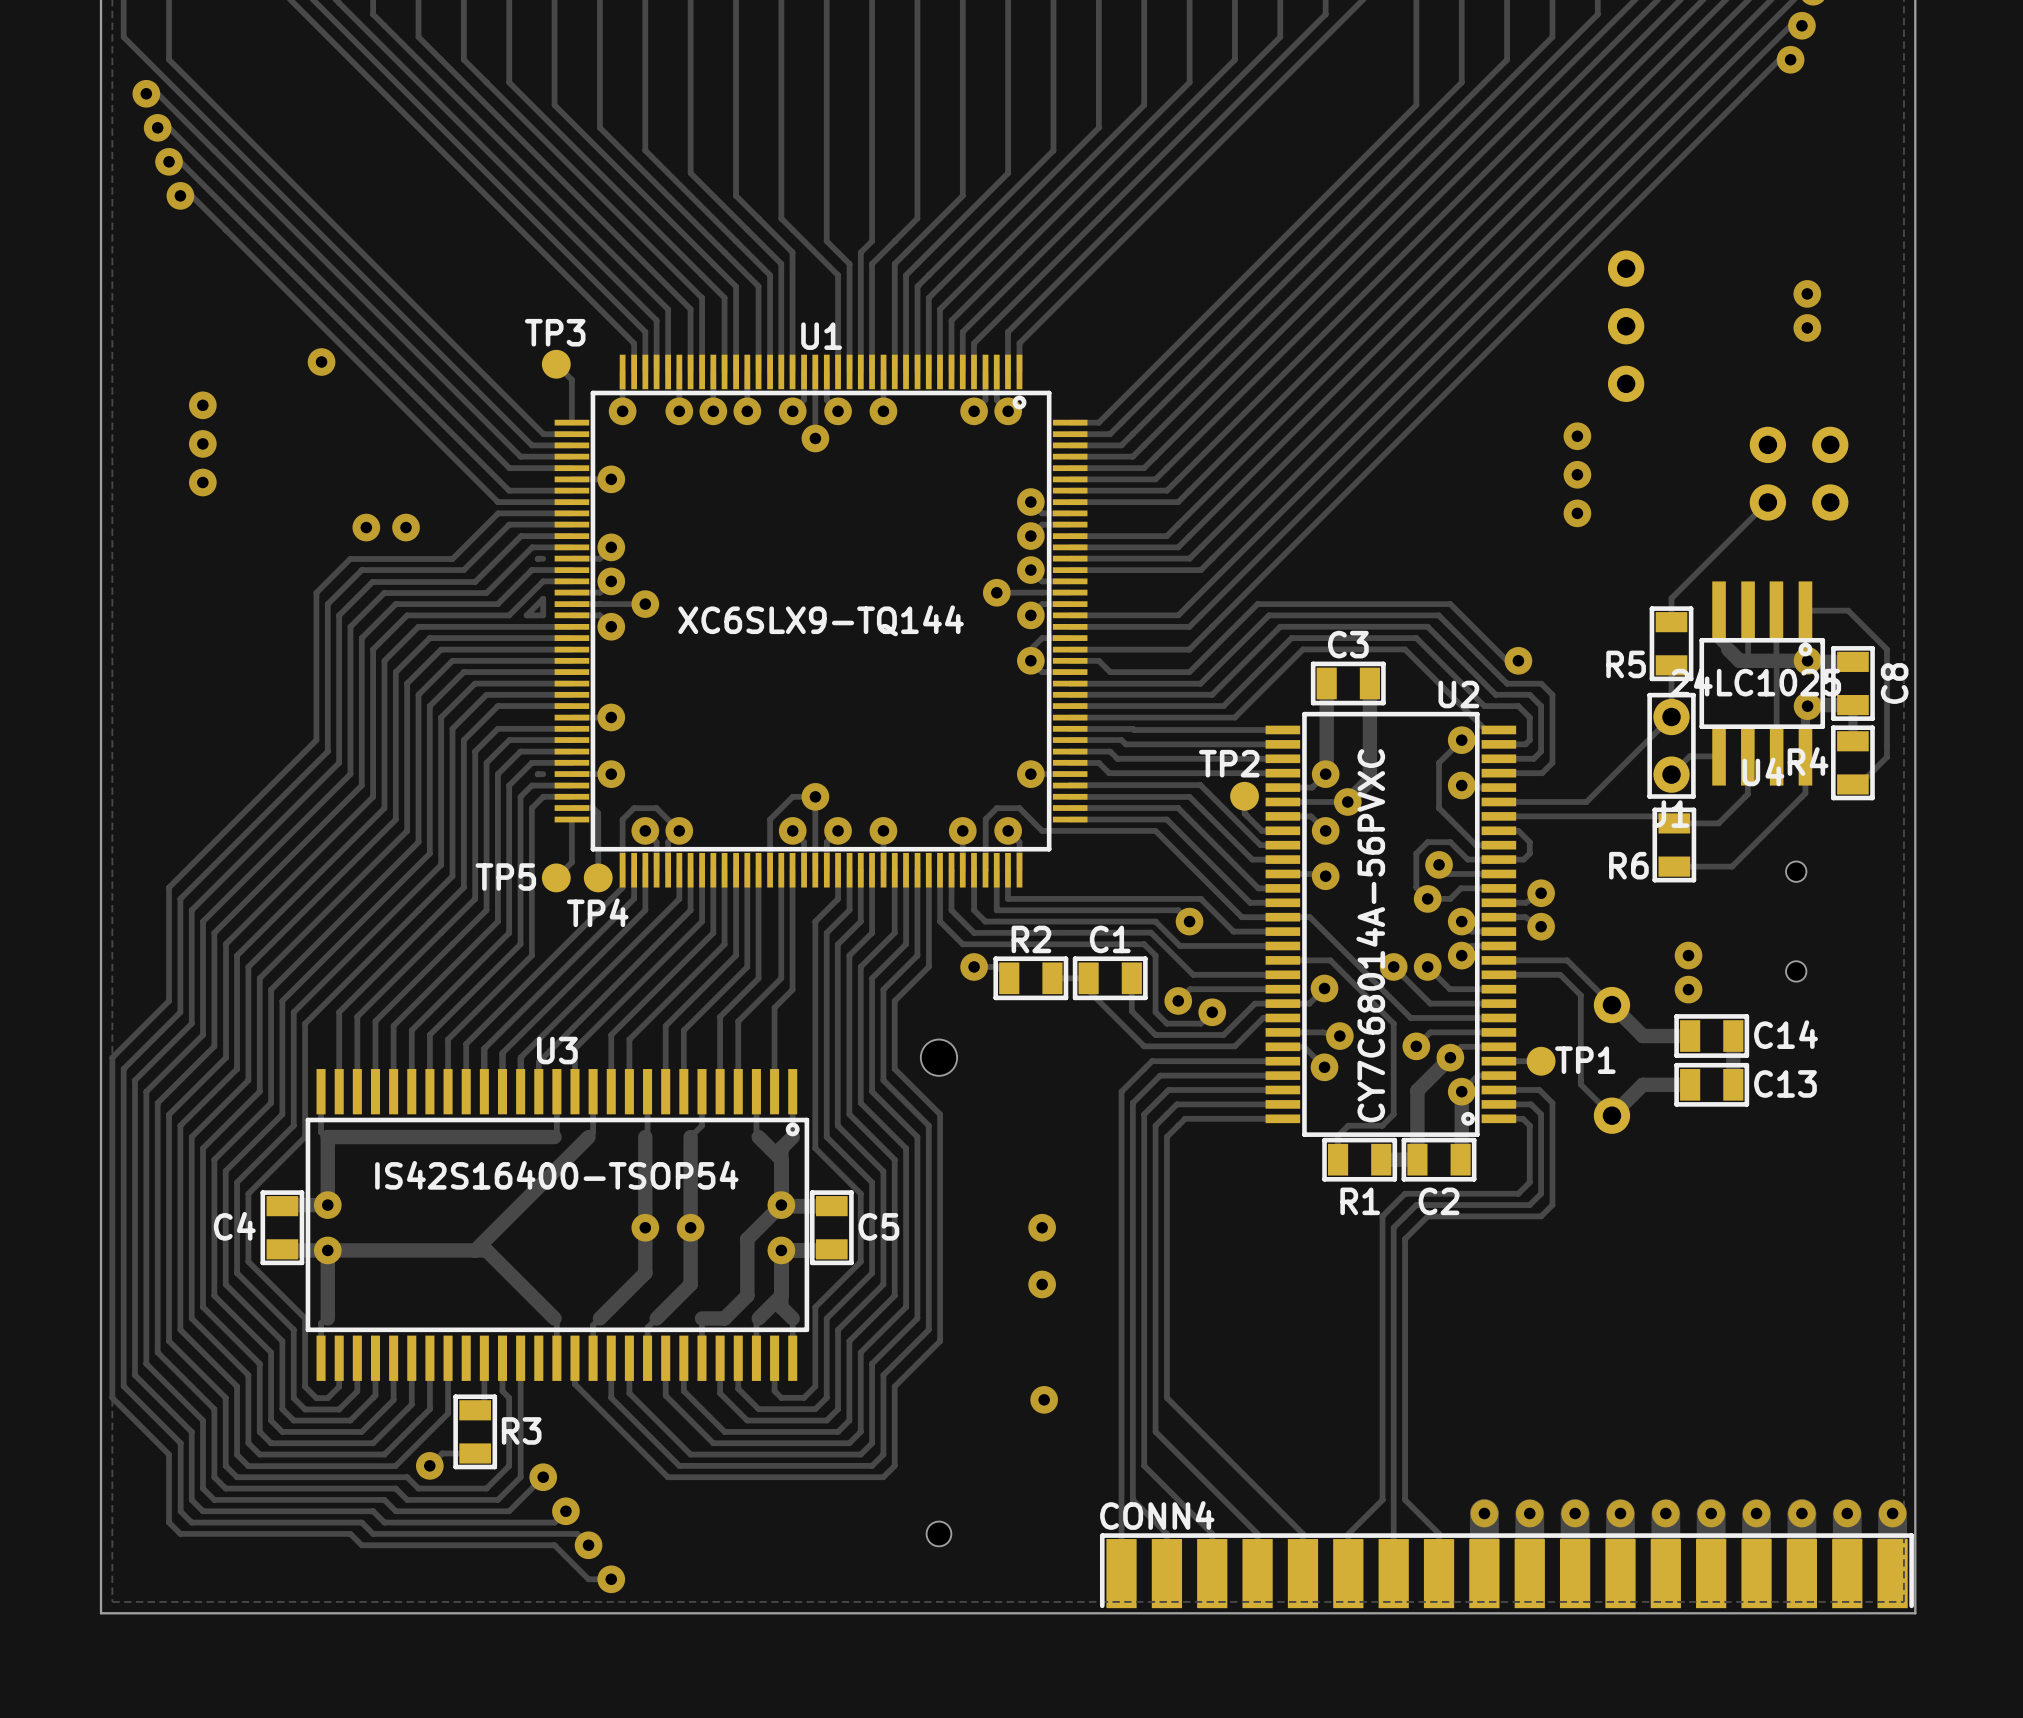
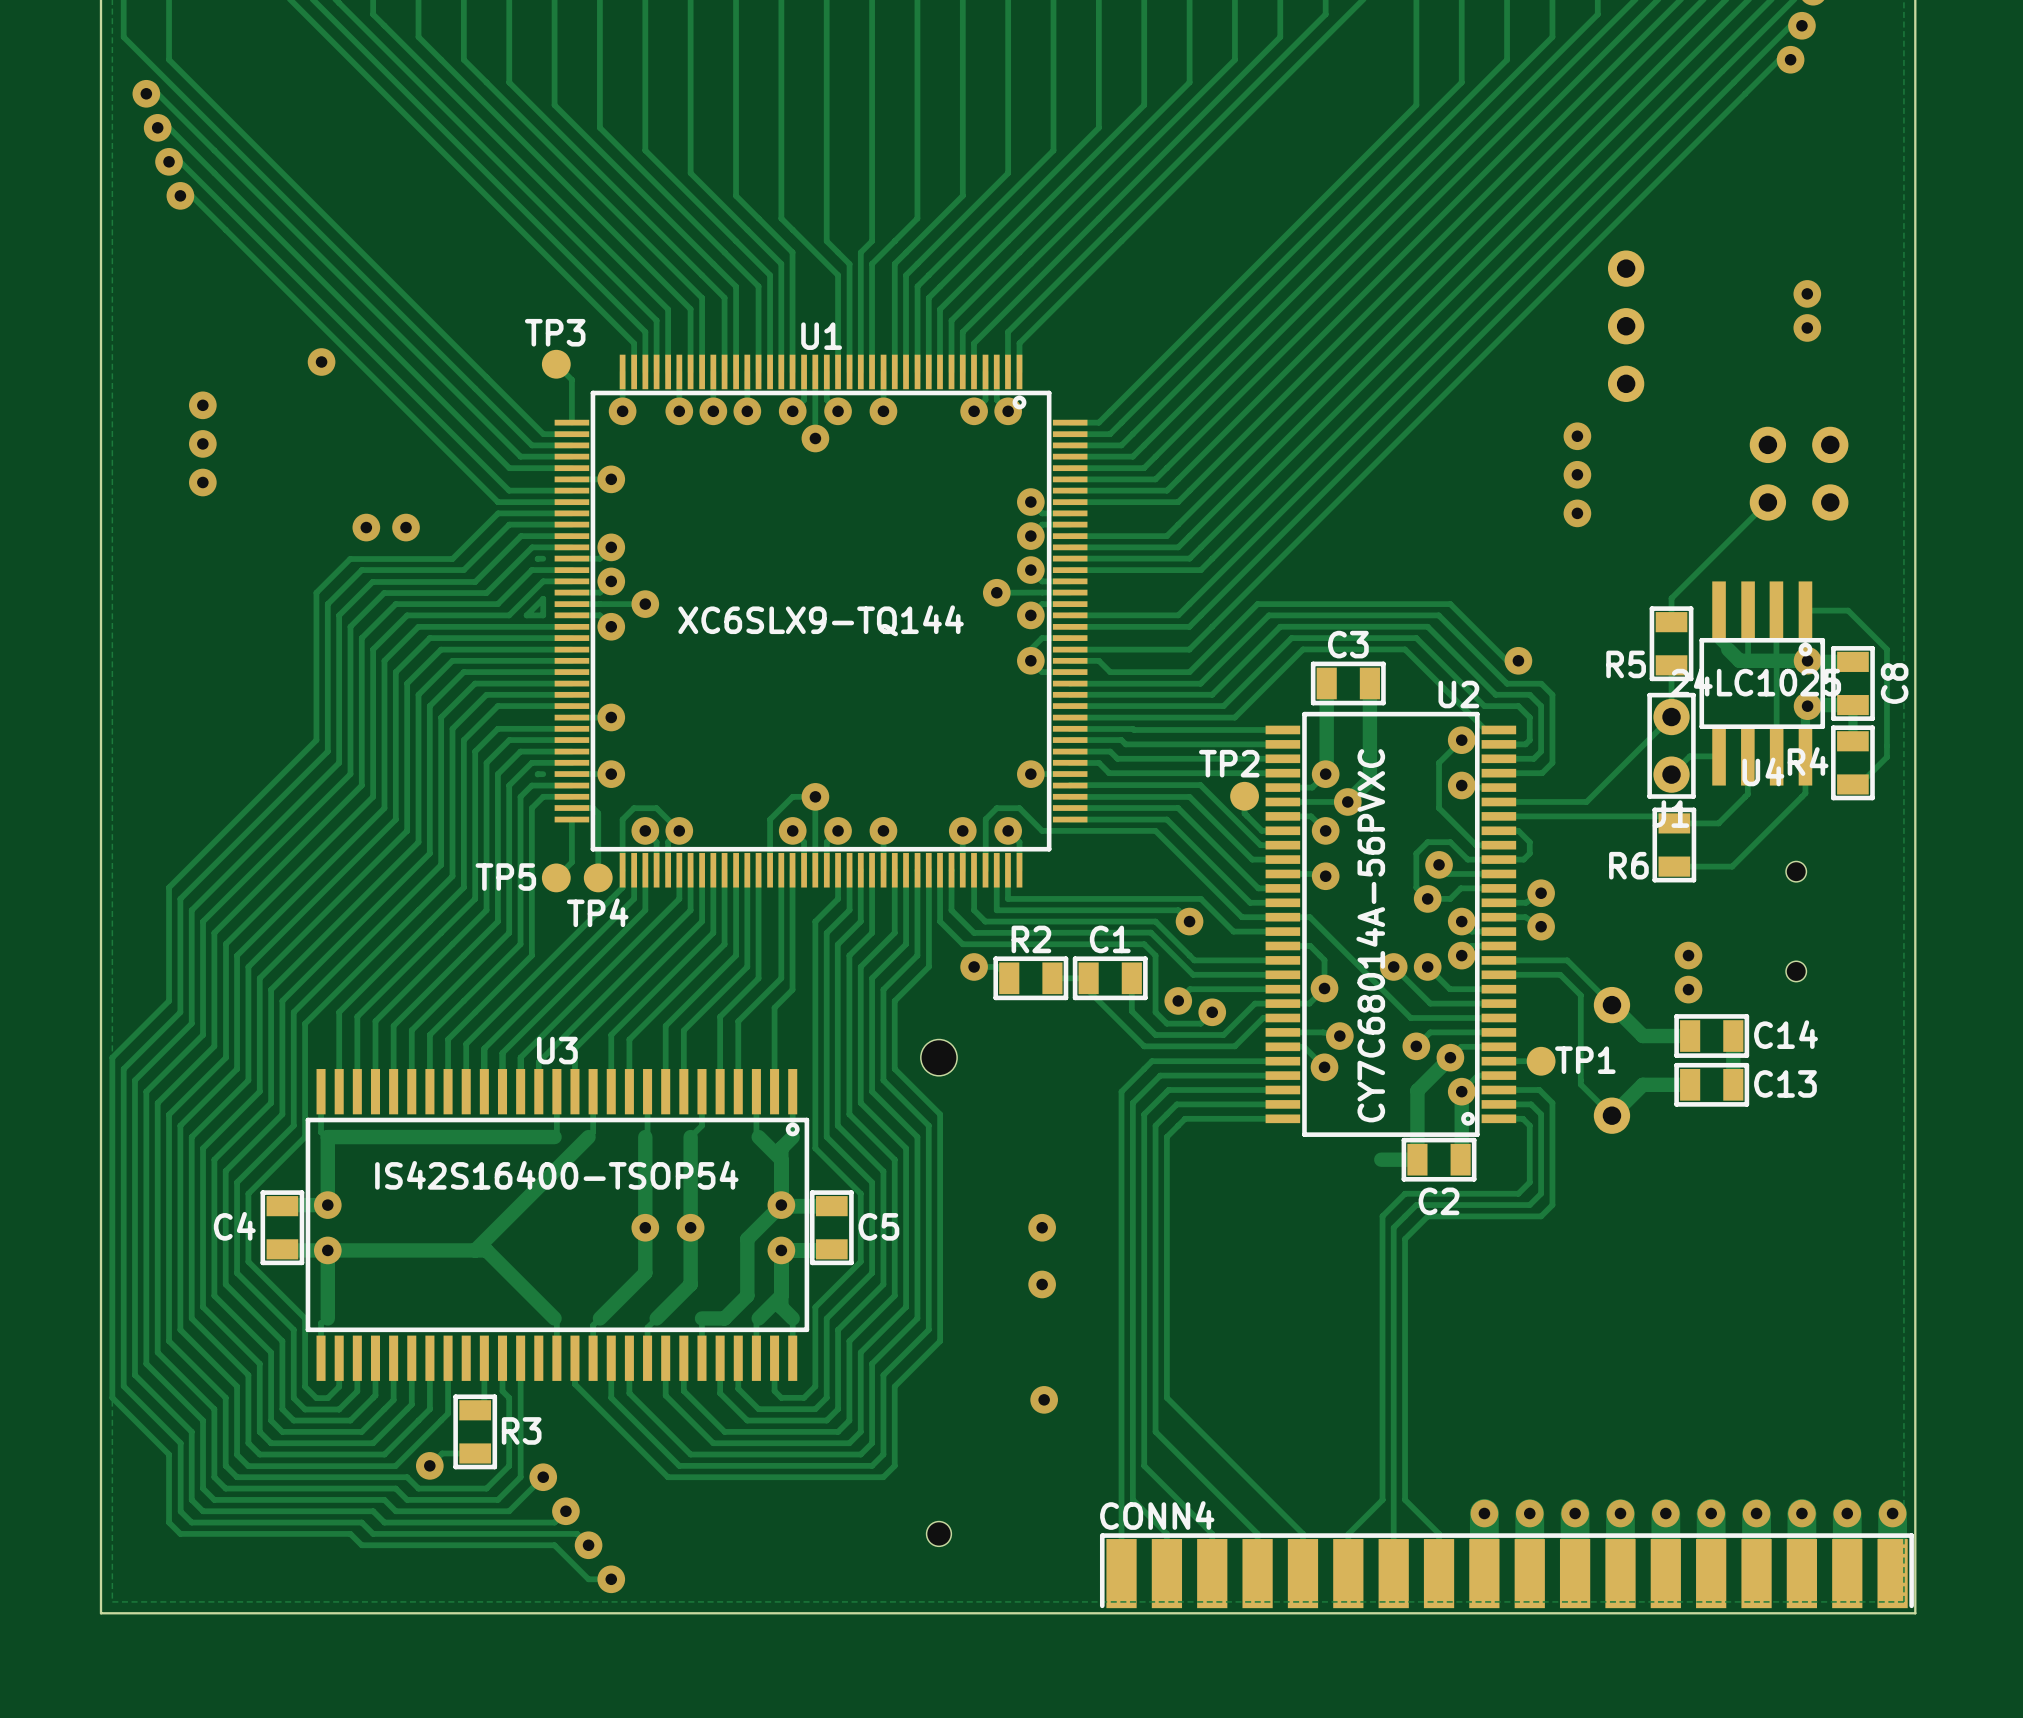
track: (1179, 945) (1282, 945) -> (1179, 945) (1194, 960) (1282, 960)
track: none -> (1282, 945) (1310, 945) (1324, 960) (1324, 988)
track: (1282, 960) (1330, 960) (1393, 1023) (1393, 1114) (1382, 1125) (1348, 1125) (1338, 1135) (1338, 1159) -> none
R1: (1359, 1159) -> none

